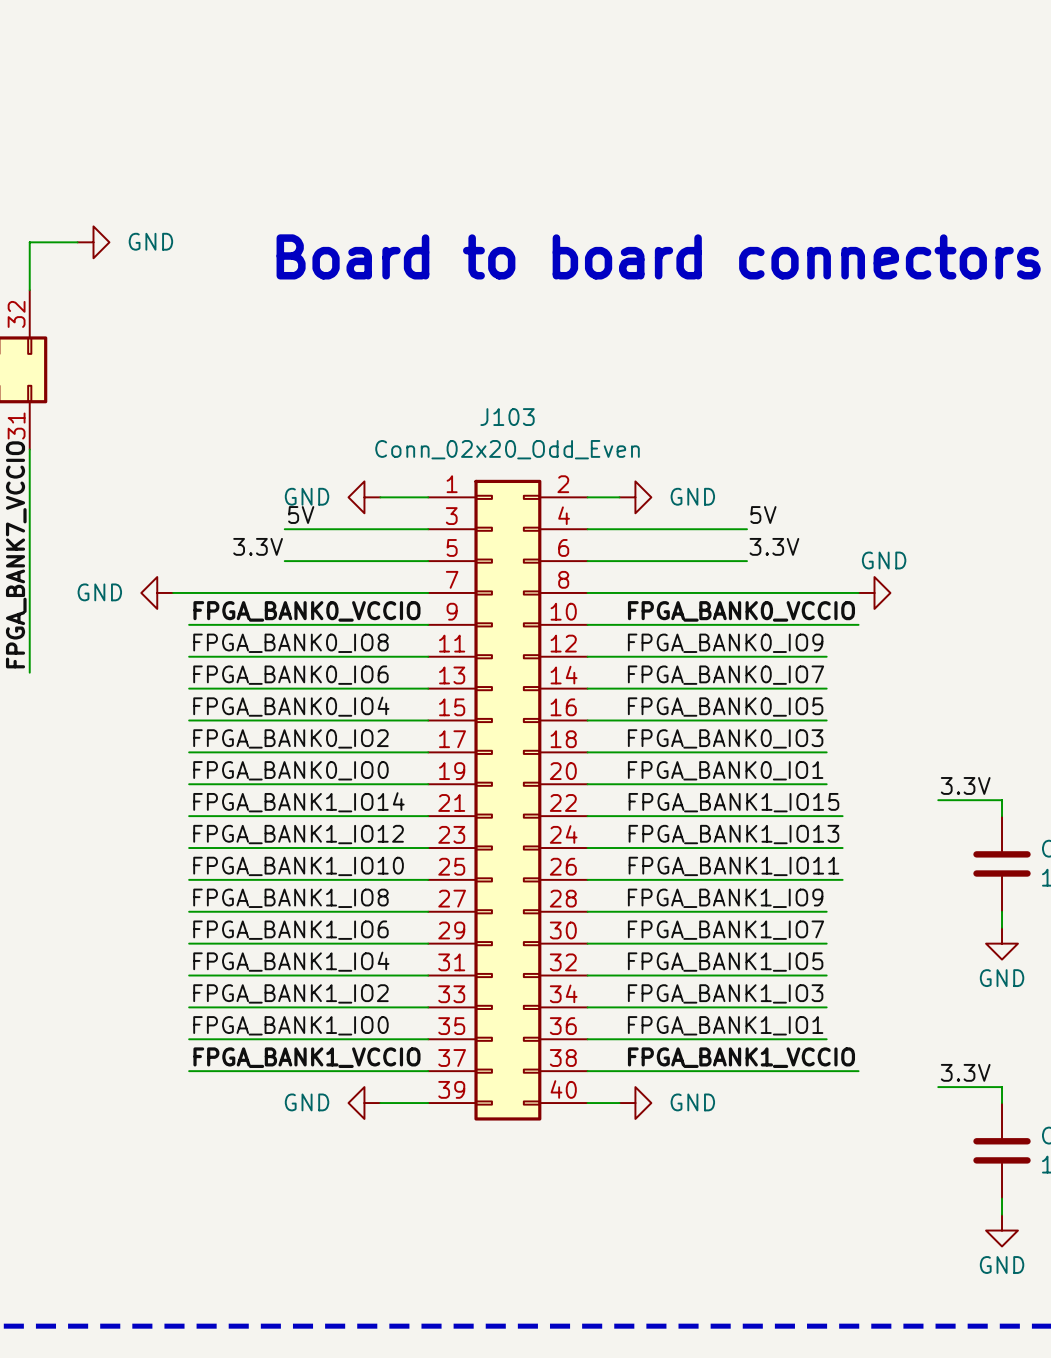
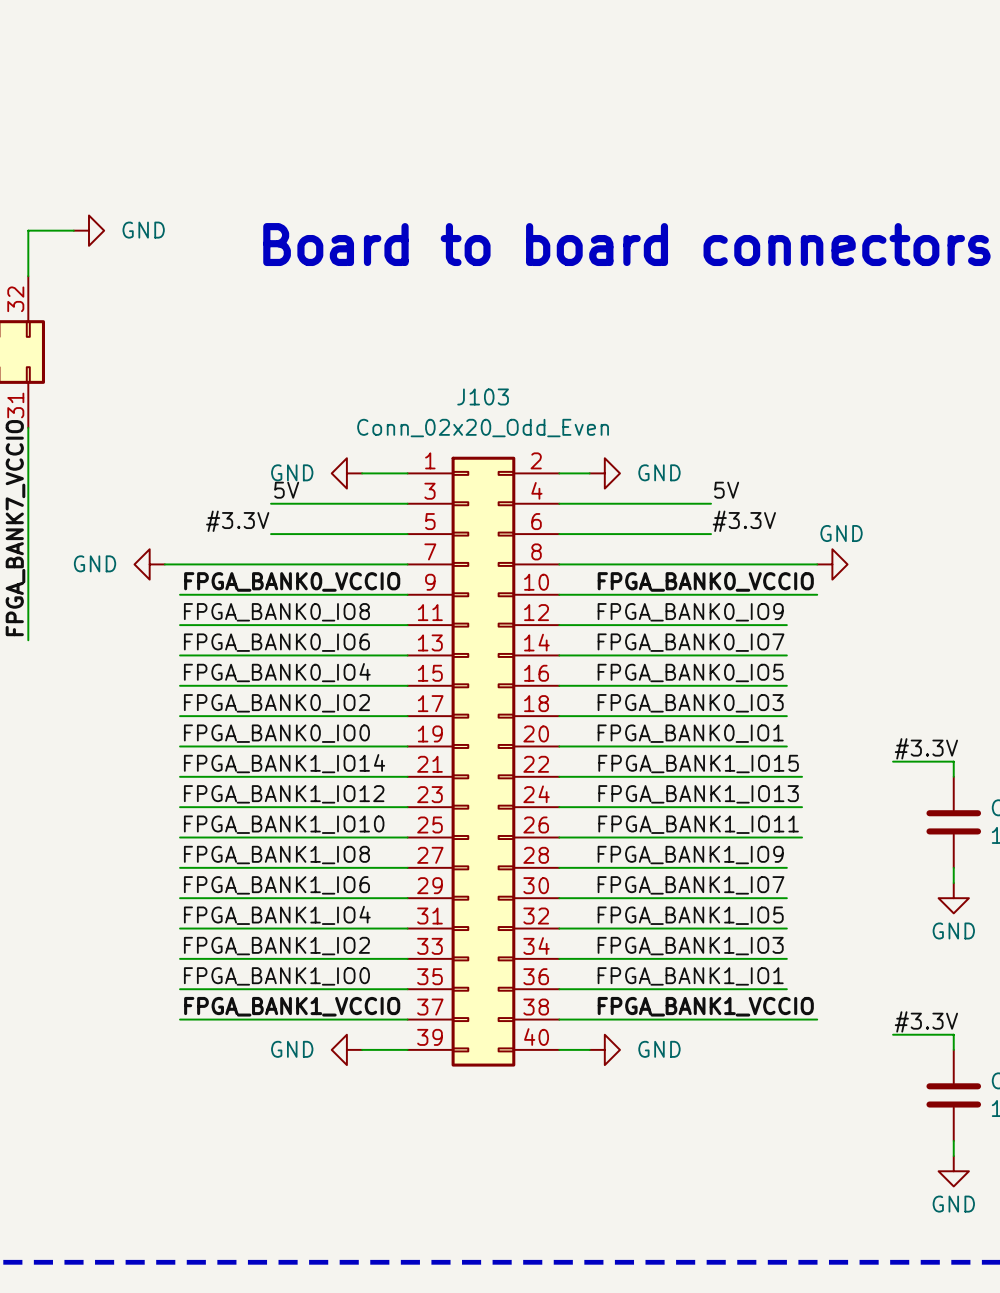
label: 3.3V (258, 546) -> #3.3V (237, 521)
label: 3.3V (774, 546) -> #3.3V (744, 521)
label: 3.3V (965, 785) -> #3.3V (926, 748)
label: 3.3V (965, 1072) -> #3.3V (926, 1021)

